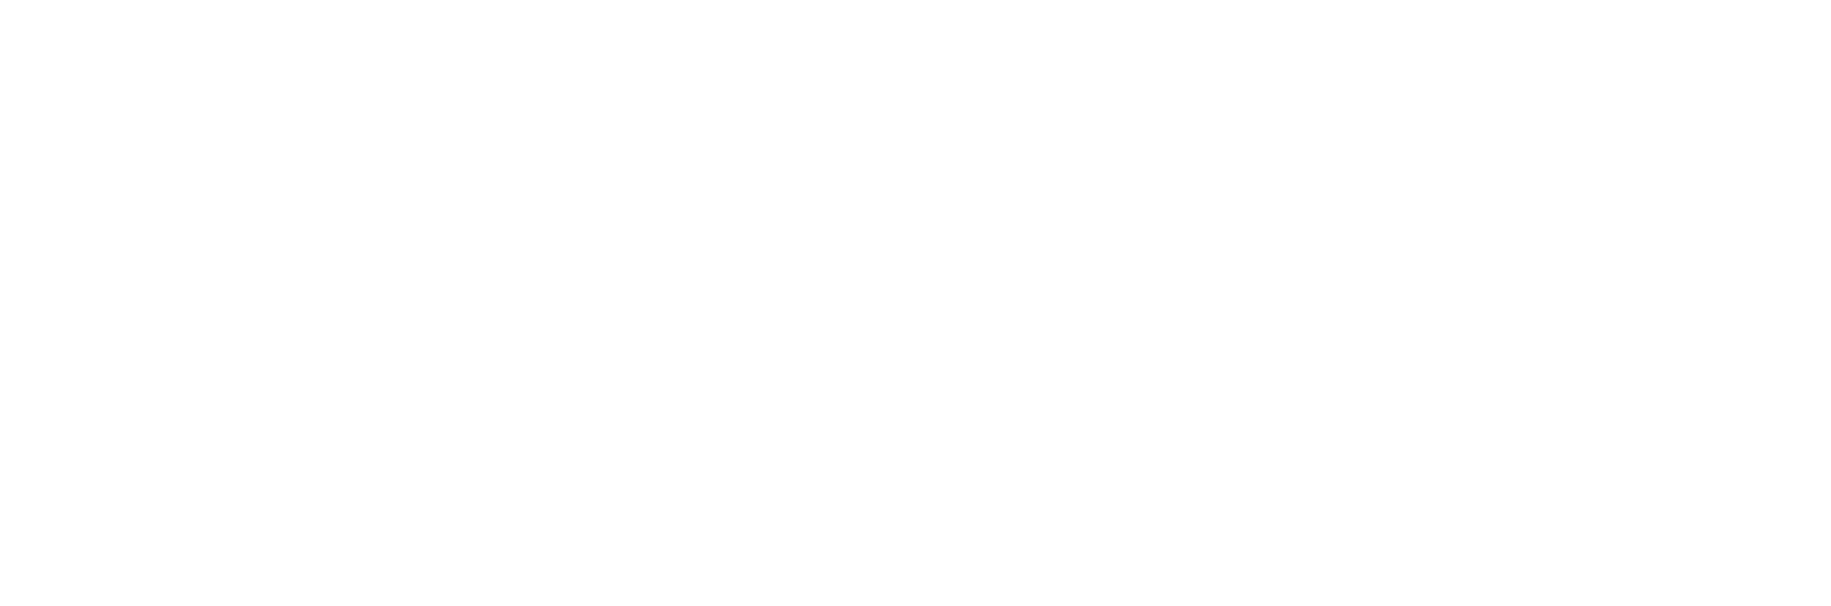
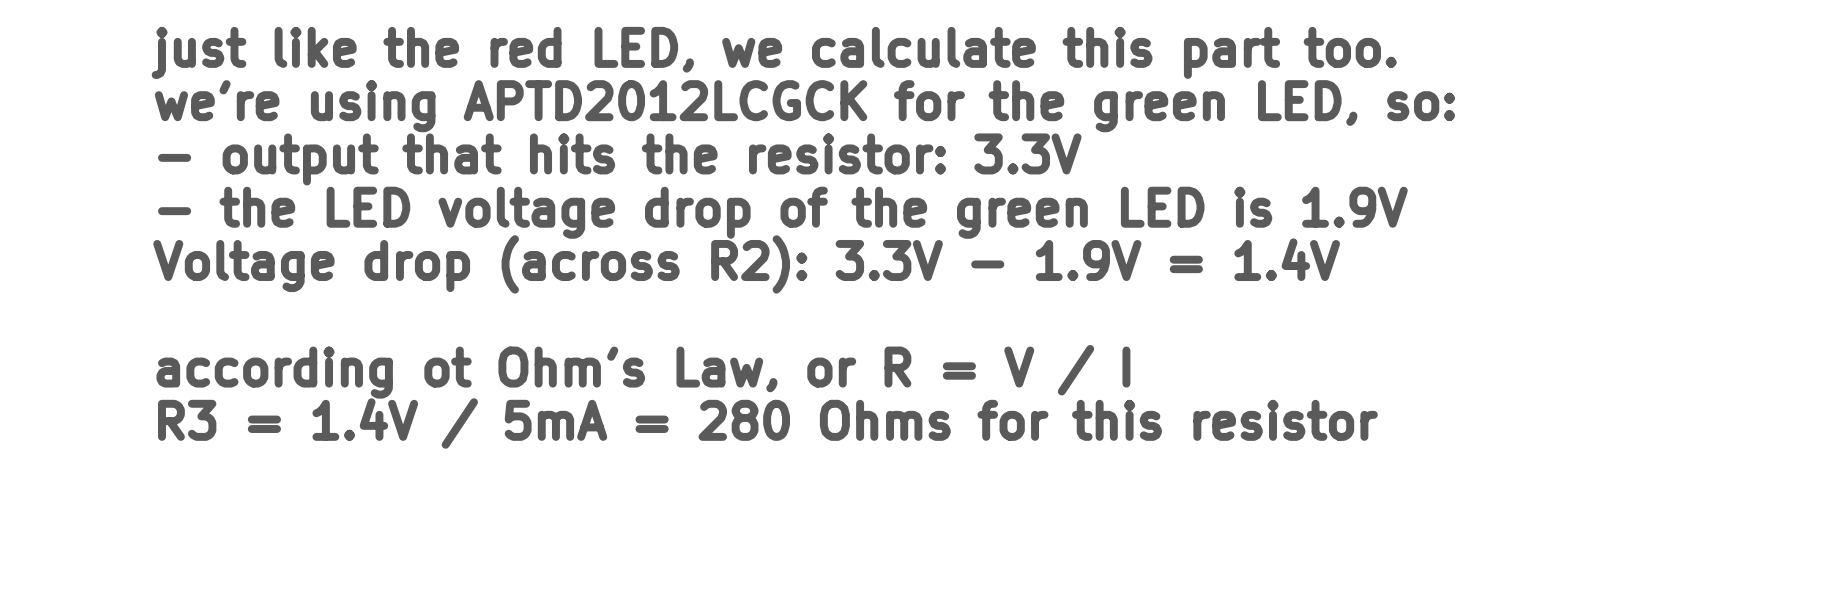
text: none -> just like the red LED, we calculate this part too. (774, 52)
text: none -> we're using APTD2012LCGCK for the green LED, so: (804, 106)
text: none -> - output that hits the resistor: 3.3V (619, 159)
text: none -> - the LED voltage drop of the green LED is 1.9V (782, 212)
text: none -> Voltage drop (across R2): 3.3V - 1.9V = 1.4V (746, 264)
text: none -> according ot Ohm's Law, or R = V / I (643, 371)
text: none -> R3 = 1.4V / 5mA = 280 Ohms for this resistor (767, 423)

